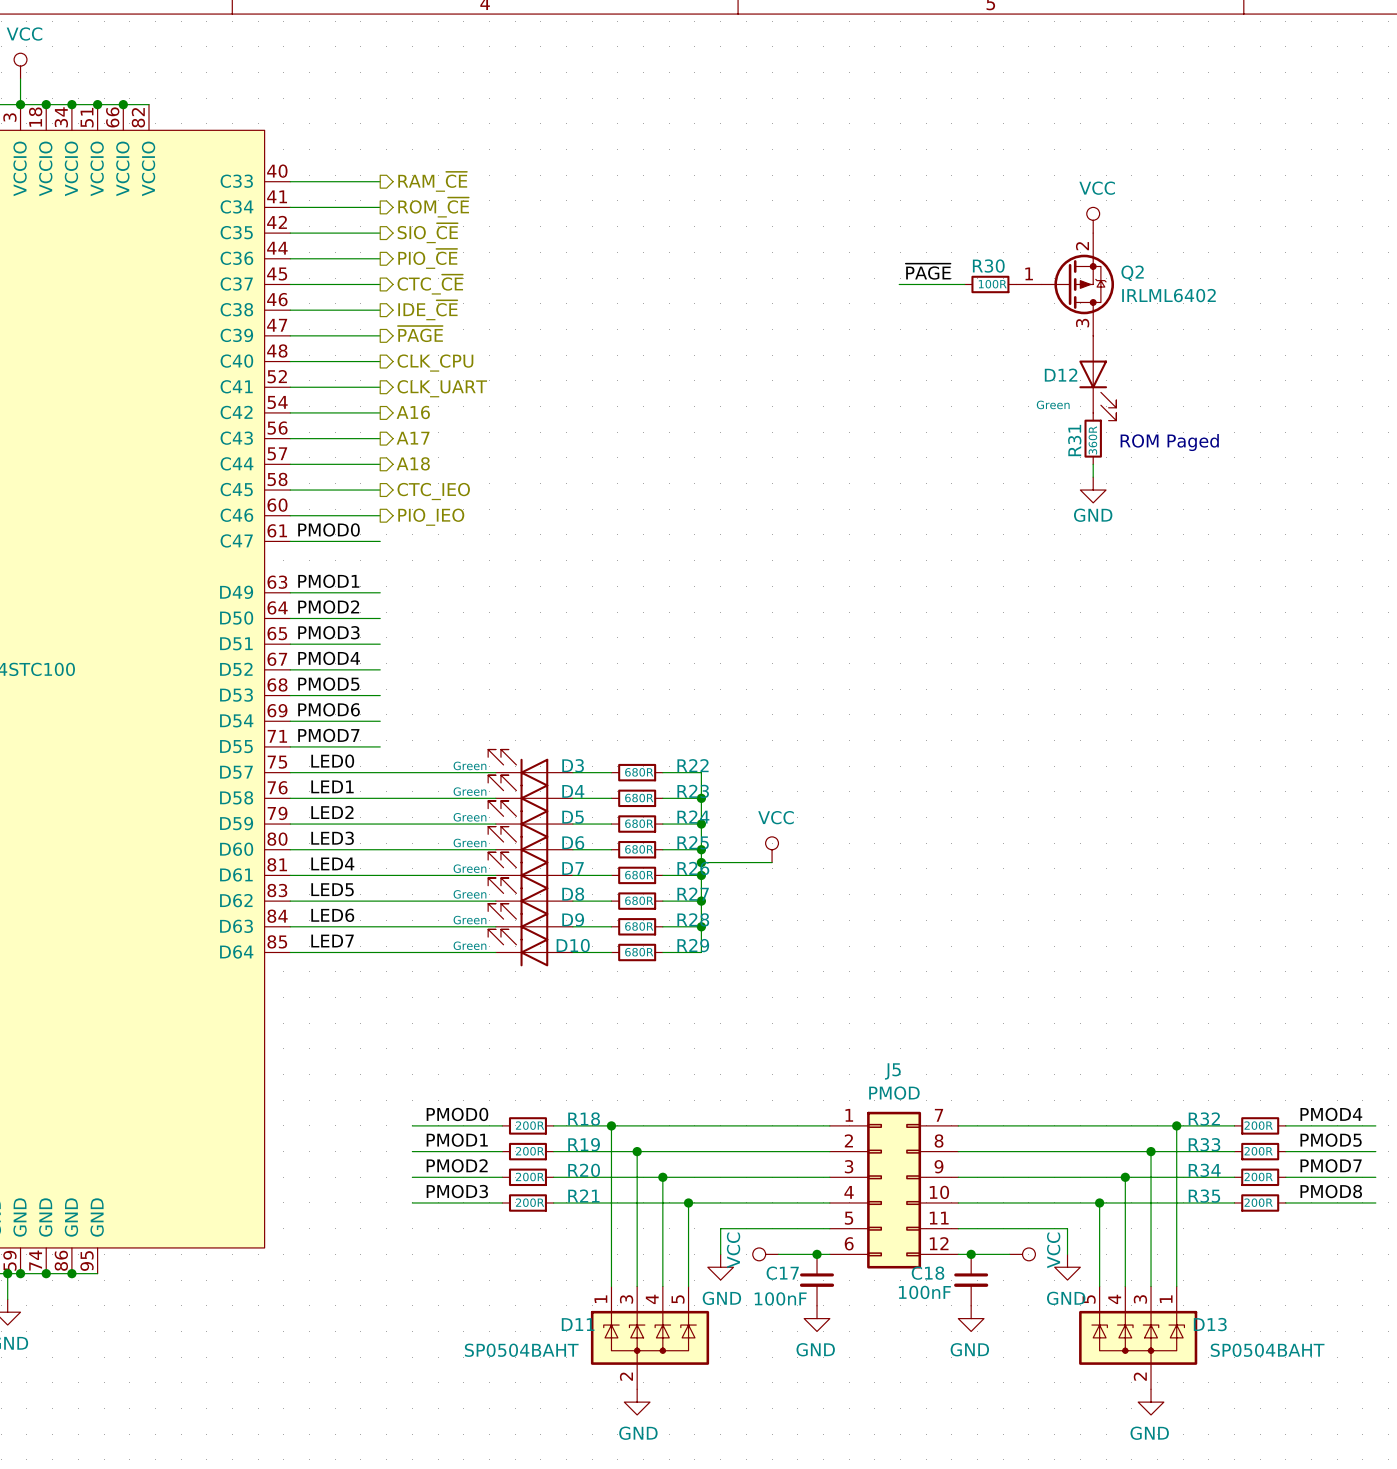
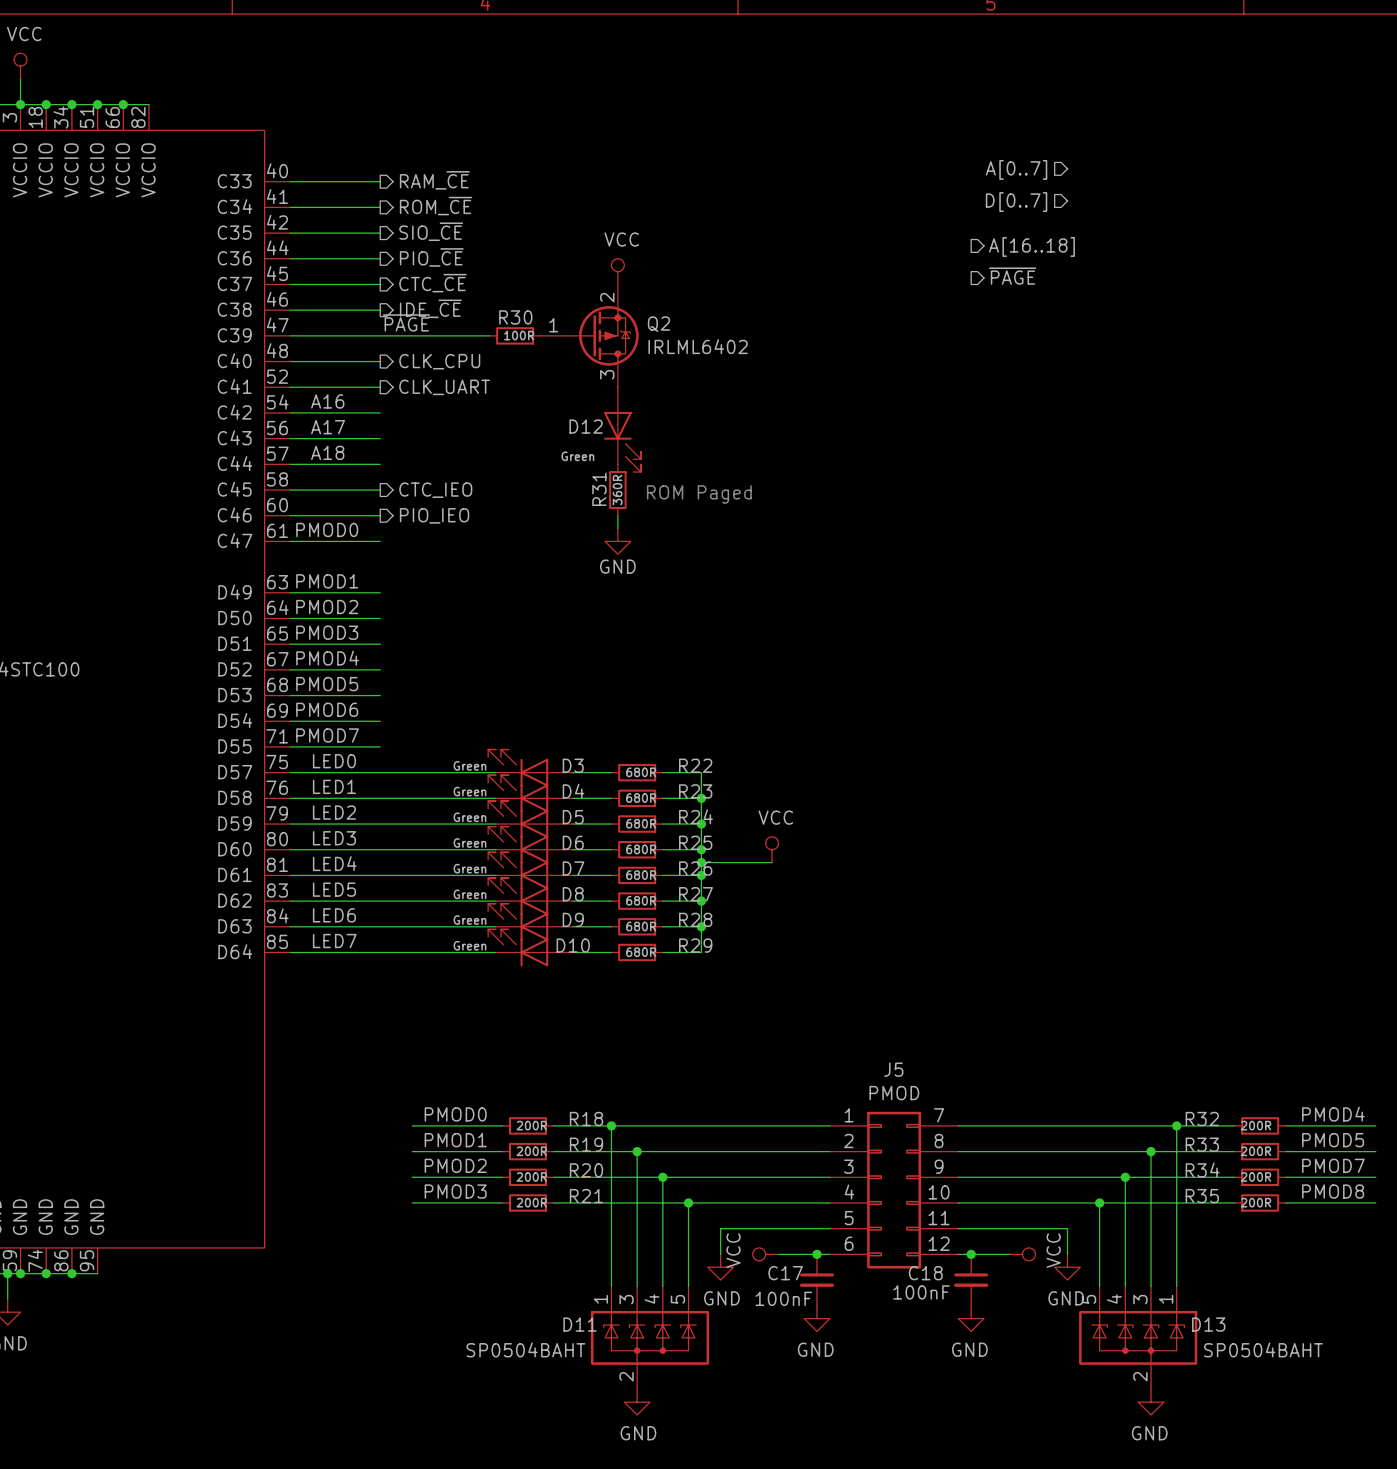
hierarchical label: none -> A[0..7] (1016, 169)
hierarchical label: none -> D[0..7] (1016, 202)
power symbol: VCC (1093, 220) -> none
hierarchical label: none -> A[16..18] (1031, 246)
power symbol: none -> VCC (617, 271)
label: ~{PAGE} (928, 271) -> none
hierarchical label: none -> ~{PAGE} (1012, 276)
wire: (899, 284) (964, 284) -> none
R30 position: (990, 284) -> (515, 335)
Q2 position: (1065, 284) -> (589, 335)
label: none -> ~{PAGE} (406, 322)
hierarchical label: ~{PAGE} (420, 334) -> none
wire: none -> (380, 335) (489, 335)
D12 position: (1097, 378) -> (622, 429)
label: none -> A16 (327, 401)
hierarchical label: A16 (413, 412) -> none
label: none -> A17 (328, 427)
hierarchical label: A17 (413, 438) -> none
R31 position: (1093, 438) -> (617, 490)
text: ROM Paged (1169, 442) -> none
label: none -> A18 (327, 452)
hierarchical label: A18 (413, 463) -> none
wire: (1093, 464) (1093, 477) -> none
power symbol: GND (1093, 490) -> none
text: none -> ROM Paged (699, 494)
wire: none -> (617, 515) (617, 528)
power symbol: none -> GND (617, 541)

